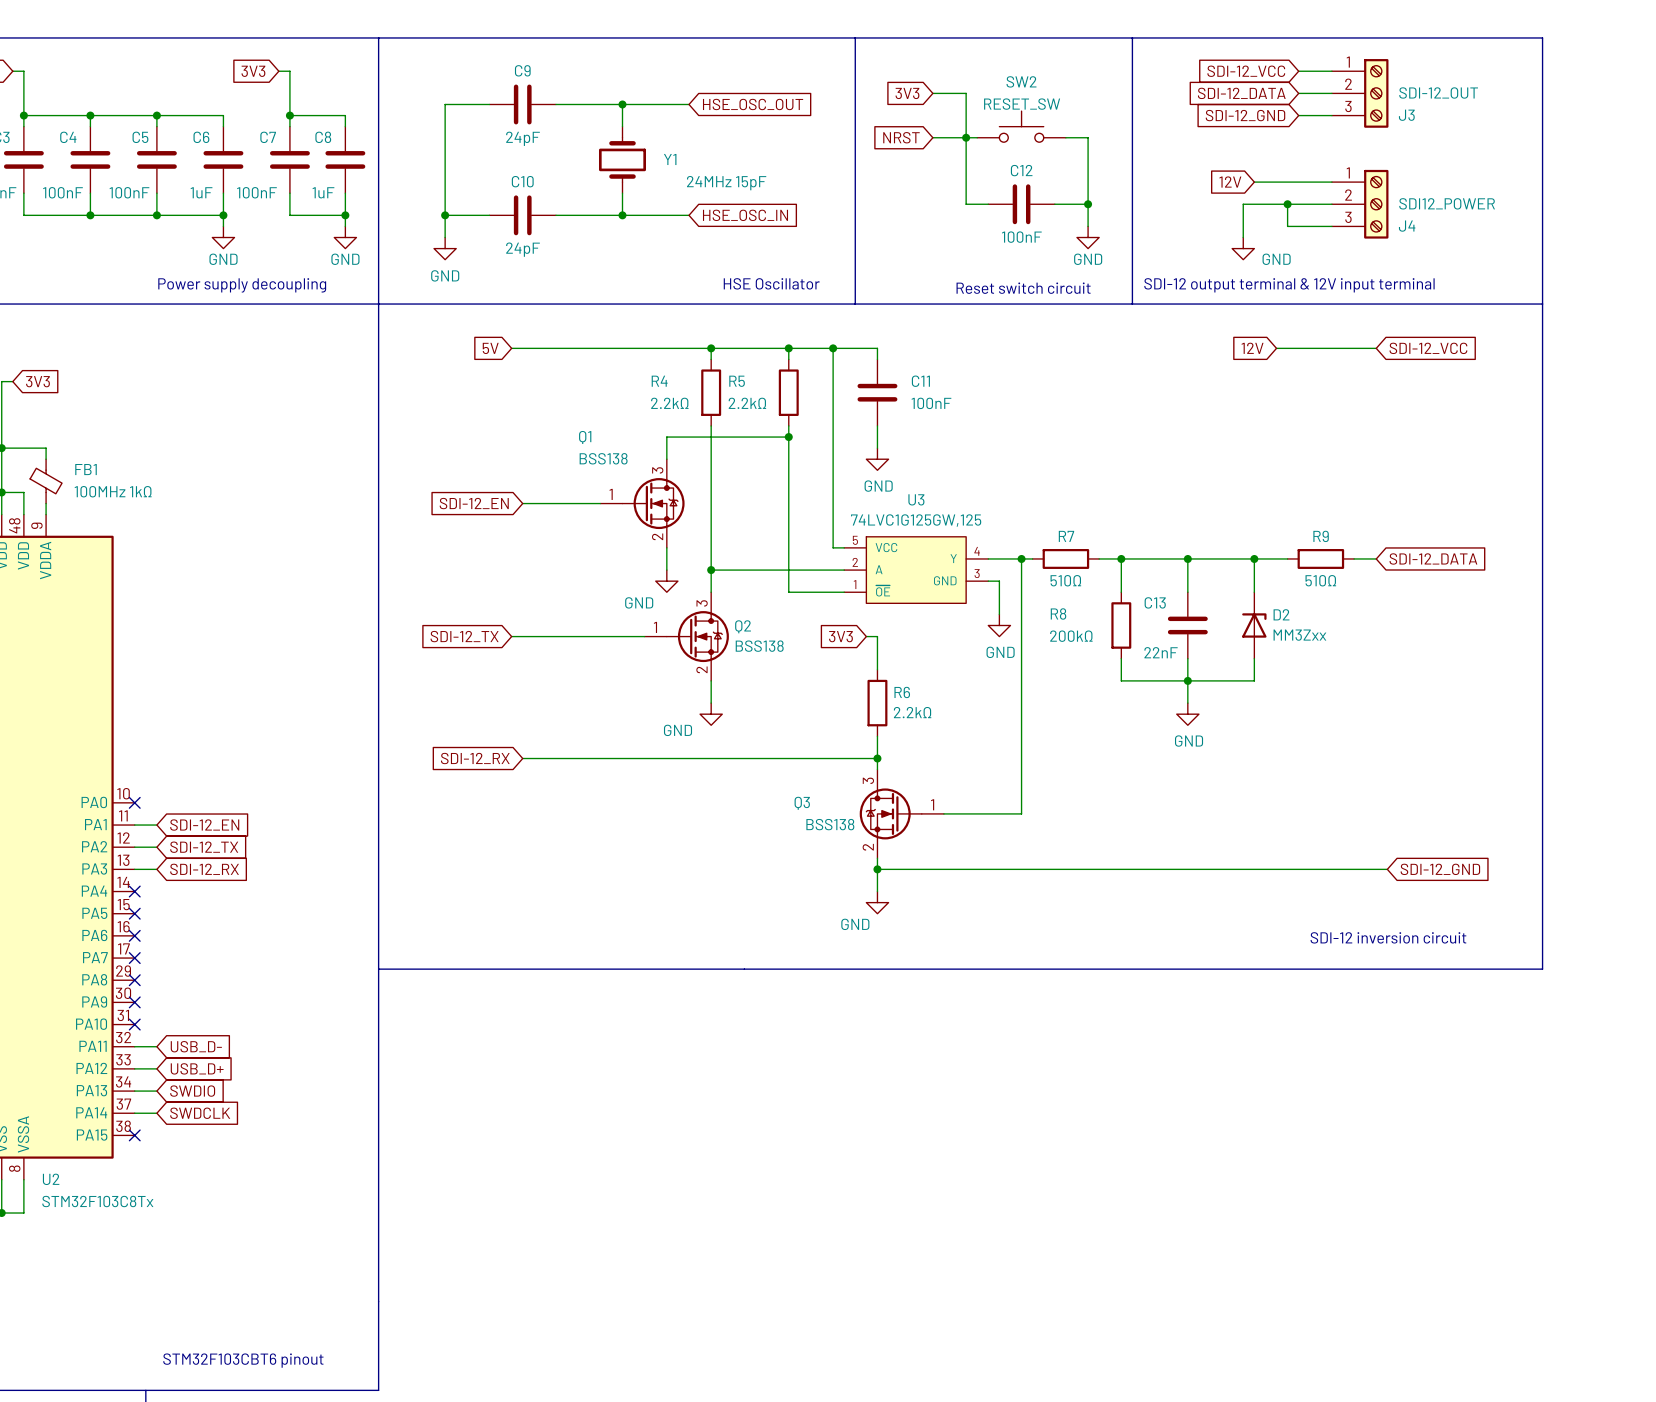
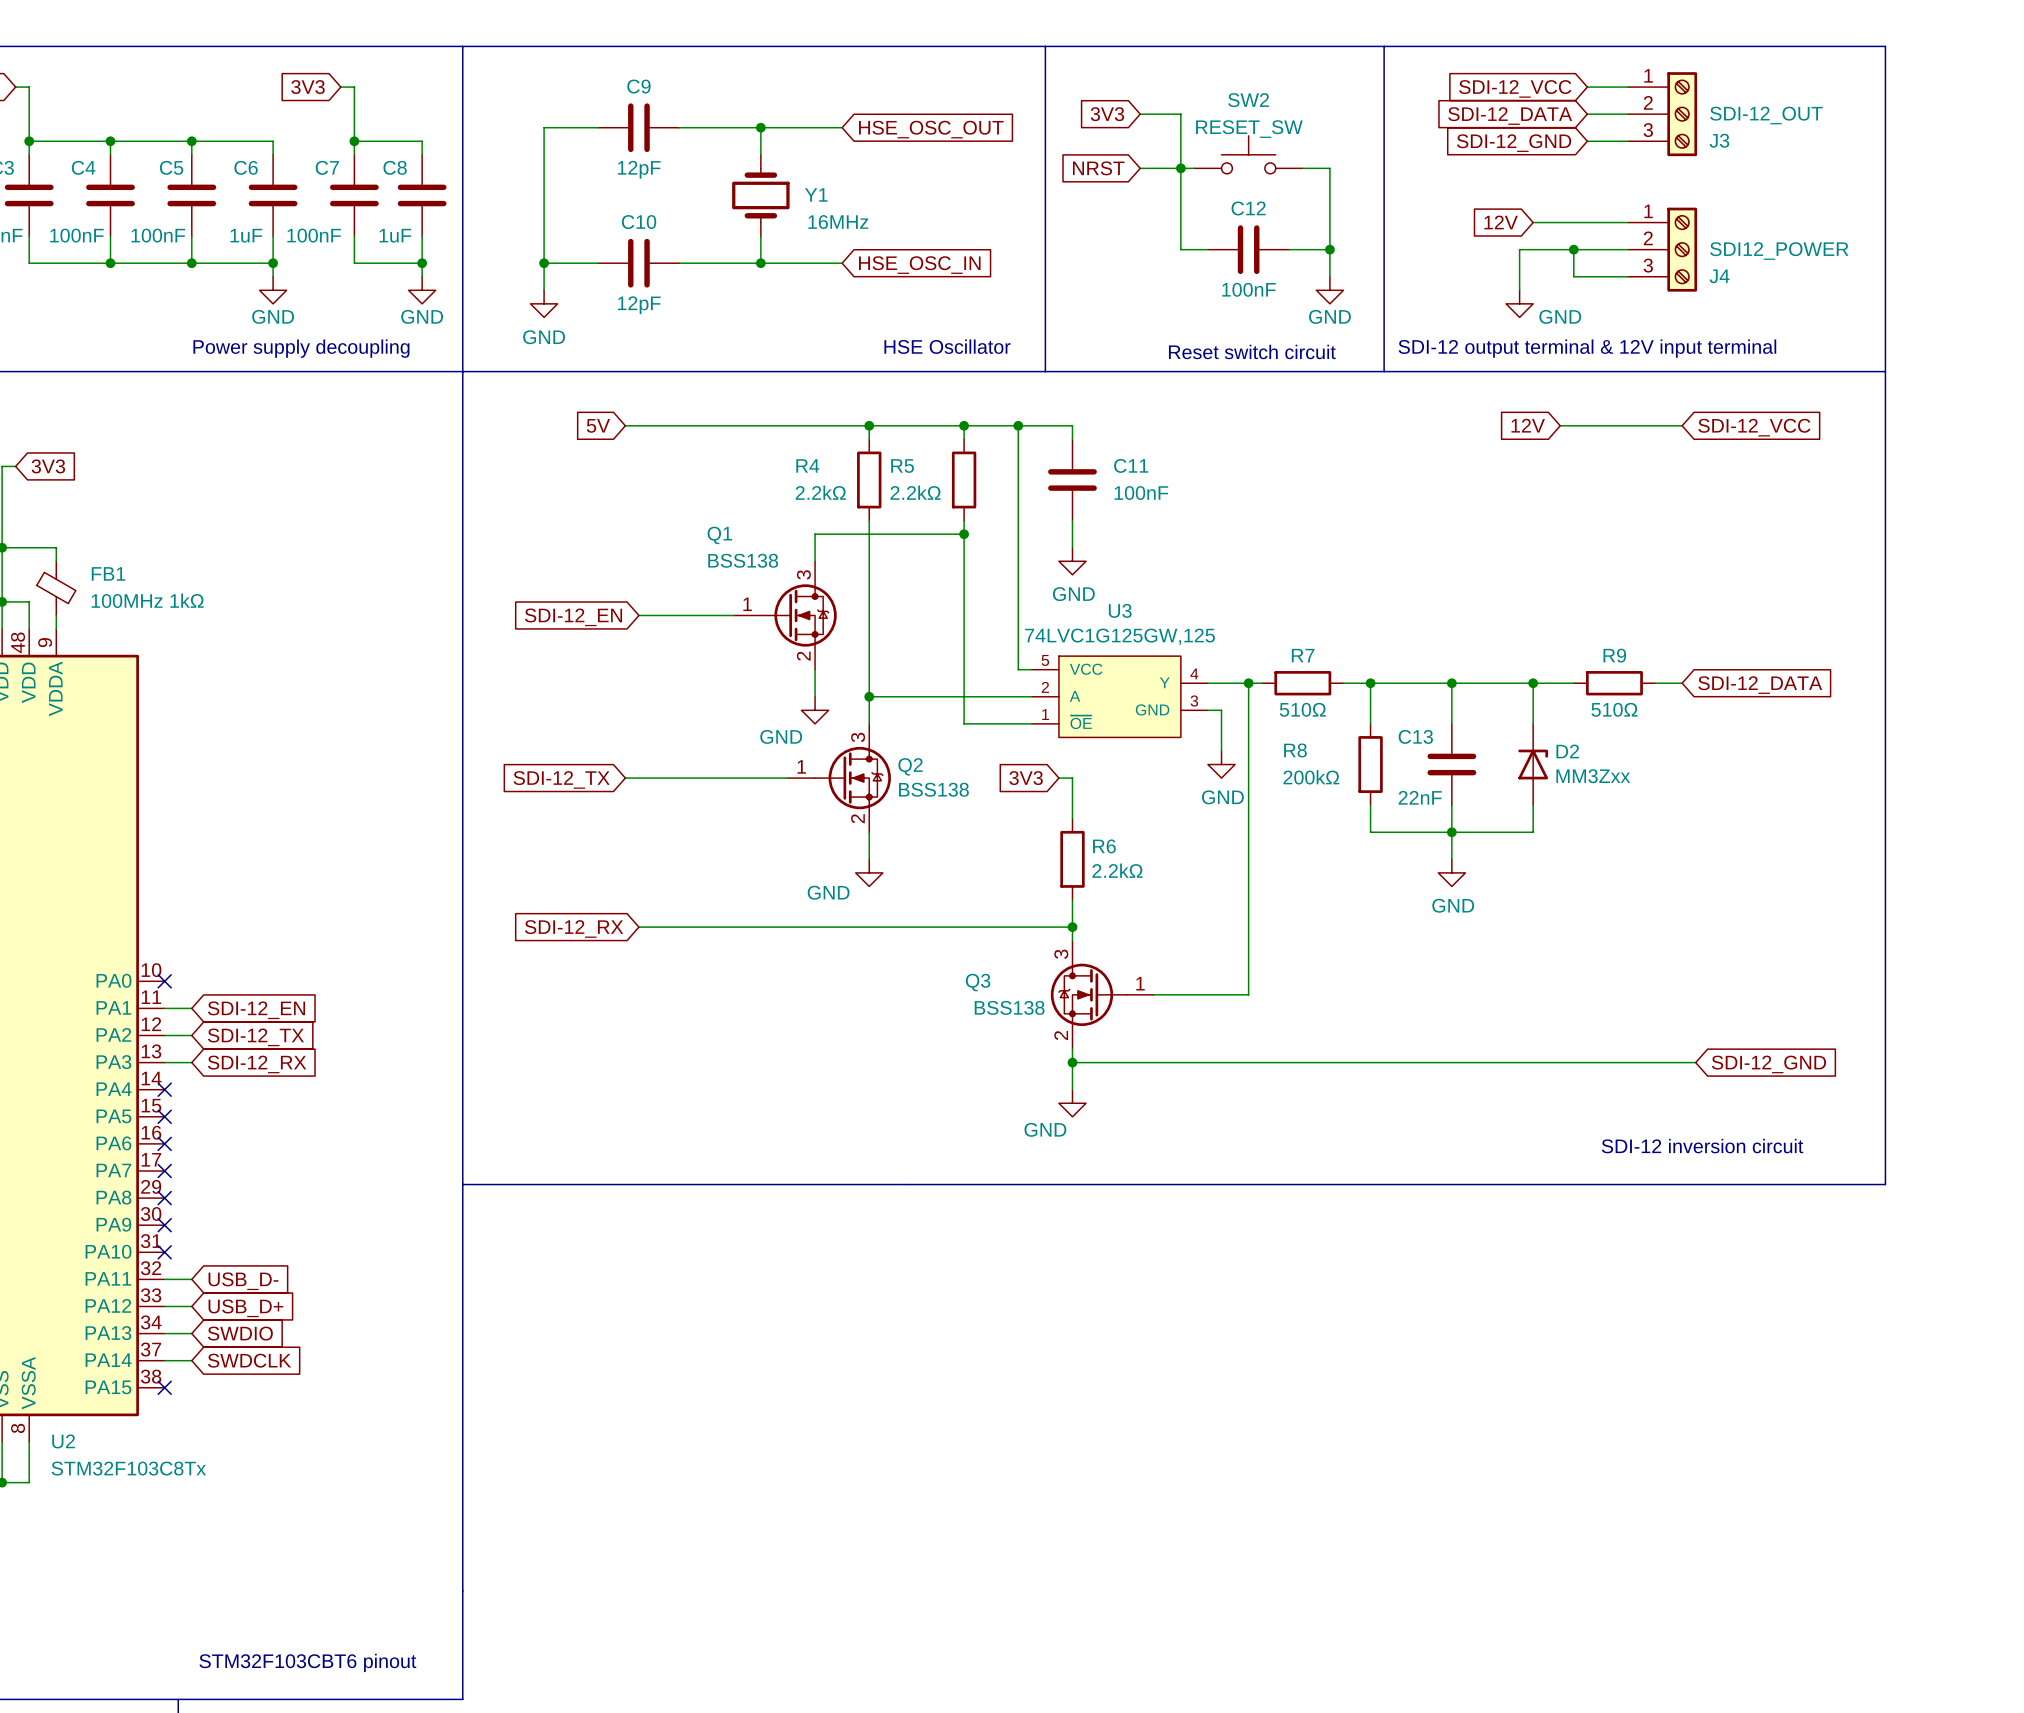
C9 value: 24pF (523, 138) -> 12pF (639, 169)
Y1 value: 24MHz 15pF (726, 183) -> 16MHz (838, 222)
C10 value: 24pF (523, 249) -> 12pF (639, 305)

